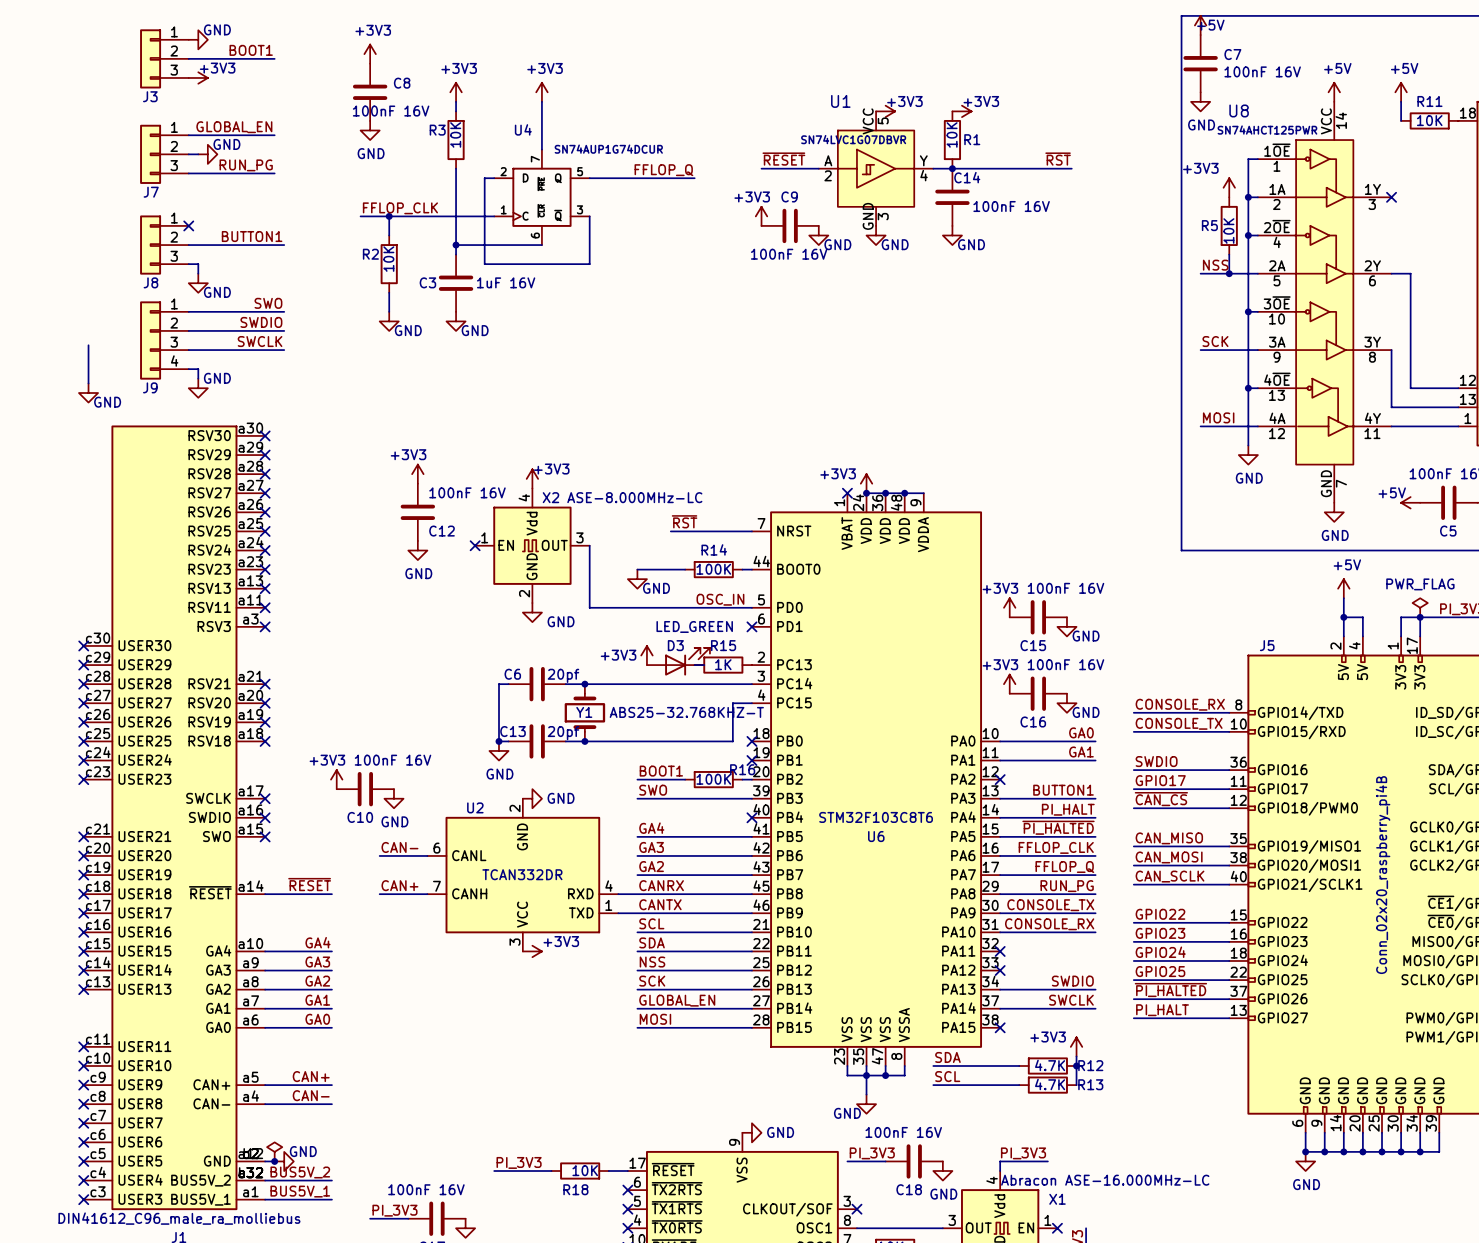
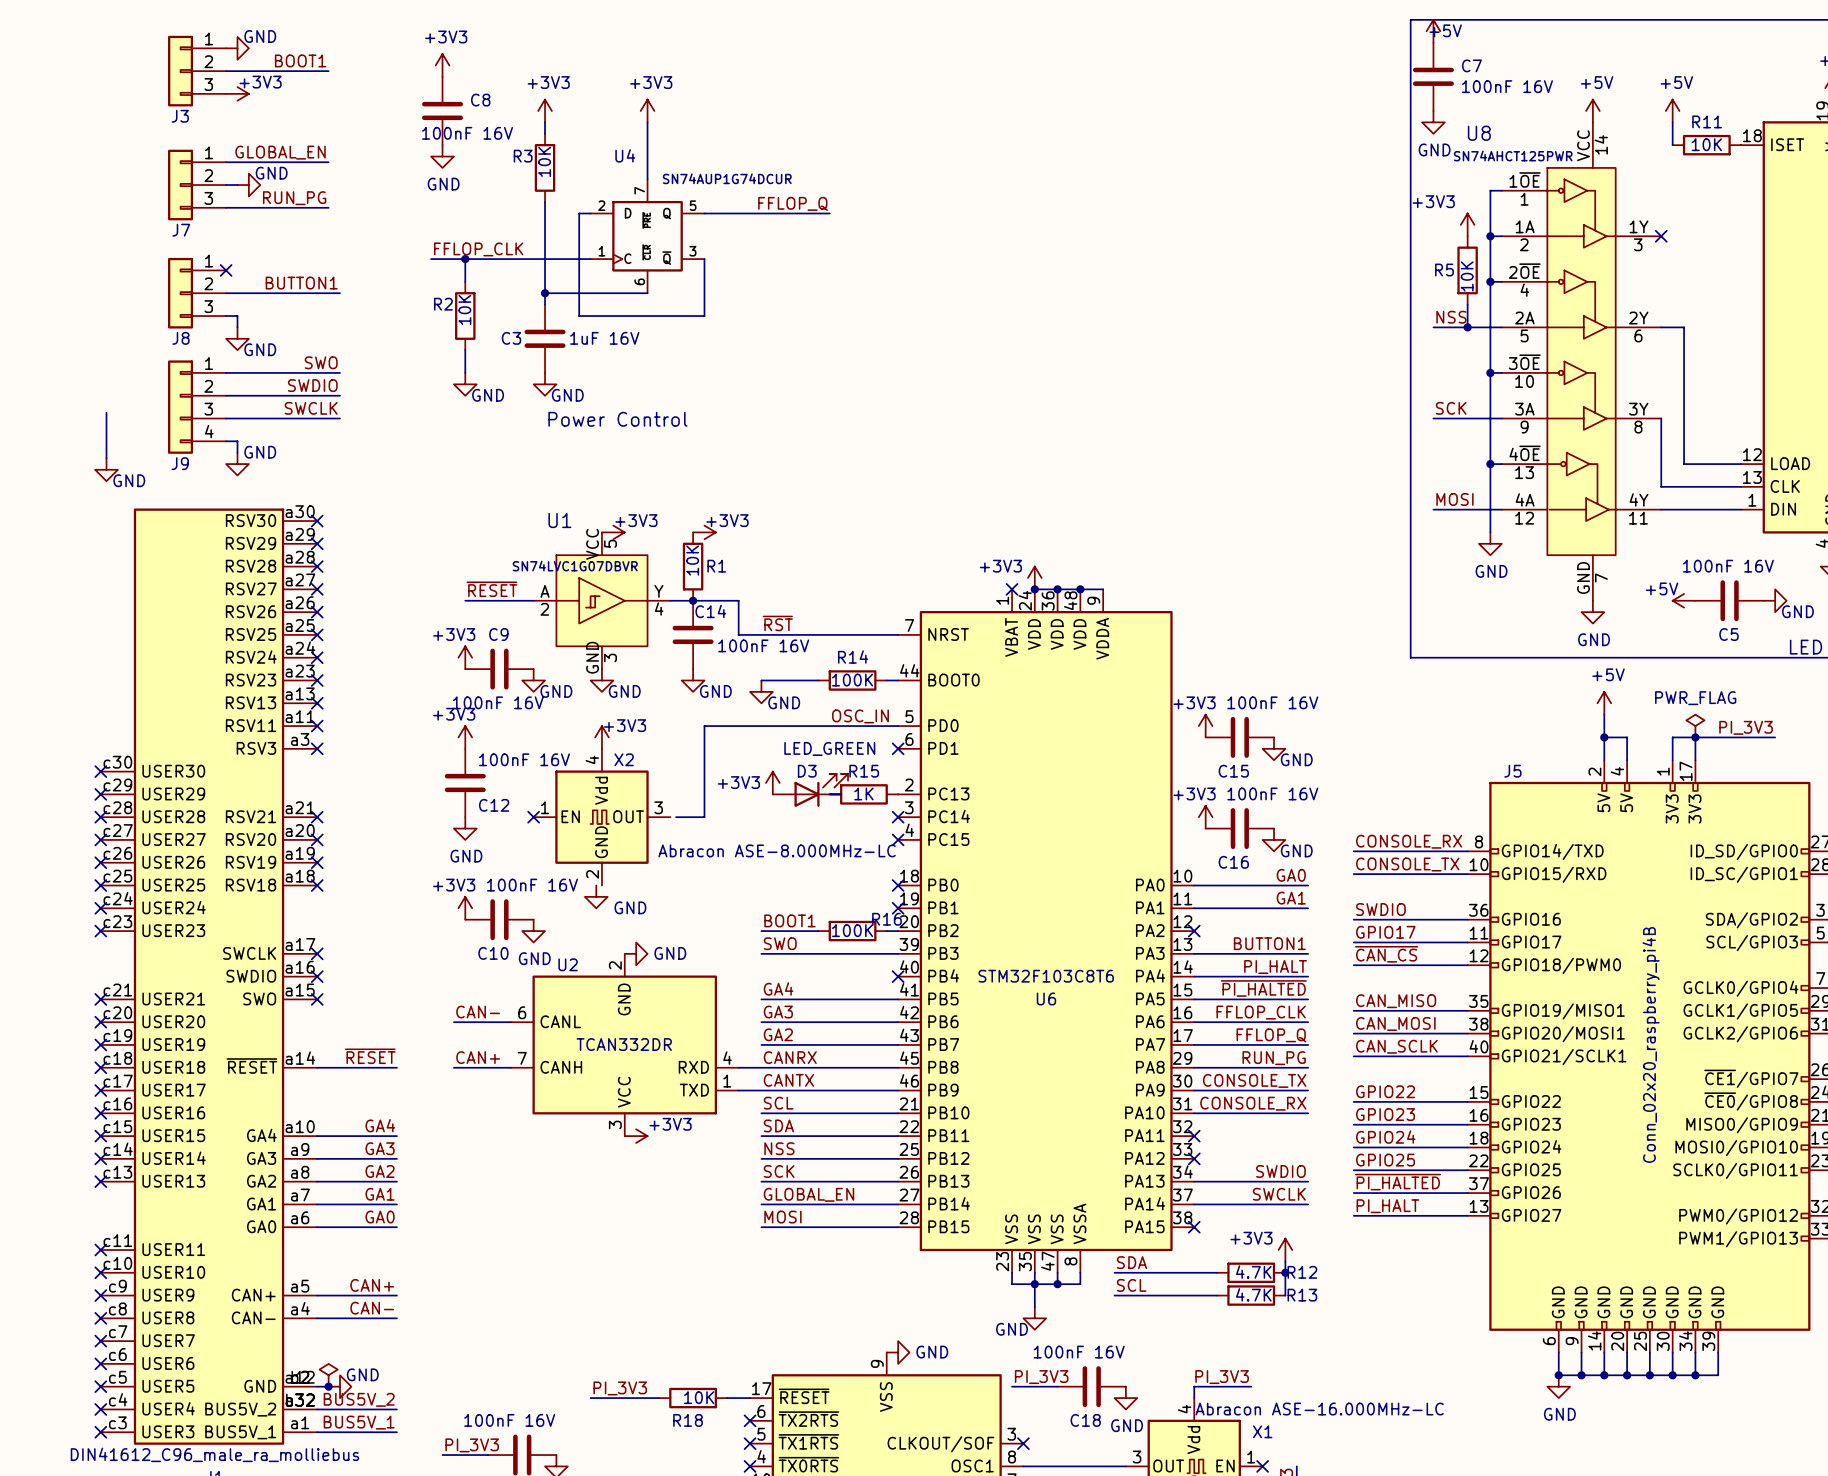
power symbol: +3V3 (885, 111) -> none
power symbol: +3V3 (961, 111) -> none
R1 position: (952, 140) -> (693, 566)
label: ~{RESET} (783, 159) -> none
label: ~{RST} (1058, 159) -> none
wire: (761, 168) (818, 168) -> none
U1 position: (876, 168) -> (601, 600)
wire: (933, 168) (1071, 168) -> none
junction: (952, 168) -> none
C14 position: (952, 197) -> (693, 634)
power symbol: +3V3 (761, 216) -> none
C9 position: (790, 225) -> (499, 669)
power symbol: GND (818, 235) -> none
power symbol: GND (876, 235) -> none
power symbol: GND (952, 235) -> none
text: none -> Power Control (617, 419)
power symbol: none -> +3V3 (613, 532)
power symbol: none -> +3V3 (704, 532)
power symbol: +3V3 (417, 474) -> none
power symbol: +3V3 (532, 478) -> none
label: none -> ~{RESET} (491, 589)
X2 value: ASE-8.000MHz-LC (634, 497) -> Abracon ASE-8.000MHz-LC (777, 850)
wire: none -> (465, 600) (533, 600)
wire: none -> (670, 600) (738, 600) (738, 634) (801, 634)
junction: none -> (693, 600)
C12 position: (417, 512) -> (465, 783)
label position: ~{RST} (684, 521) -> ~{RST} (777, 623)
no-connect mark: (475, 545) -> none
X2 position: (532, 545) -> (601, 817)
wire: (589, 545) (589, 607) -> (704, 817) (704, 726)
power symbol: none -> +3V3 (465, 657)
power symbol position: GND (417, 550) -> GND (533, 680)
power symbol: none -> GND (601, 680)
power symbol: none -> GND (693, 680)
power symbol text position: GND (418, 573) -> GND (556, 691)
power symbol: GND (532, 612) -> none
power symbol: none -> +3V3 (465, 737)
power symbol: none -> +3V3 (601, 737)
no-connect mark: none -> (533, 817)
C6: 20pf (537, 684) -> none
junction: (584, 684) -> none
wire: (589, 684) (751, 684) -> none
no-connect mark: none -> (898, 817)
power symbol: none -> GND (465, 828)
wire: (751, 703) (732, 703) (732, 741) (565, 741) -> none
no-connect mark: none -> (898, 839)
Y1: ABS25-32.768KHZ-T (584, 712) -> none
junction: (499, 741) -> none
C13: 20pf (537, 741) -> none
junction: (584, 741) -> none
power symbol text position: GND (499, 774) -> GND (630, 907)
power symbol position: +3V3 (336, 779) -> +3V3 (465, 908)
power symbol: none -> GND (533, 931)
C10 position: (365, 789) -> (499, 919)
power symbol: GND (393, 798) -> none

